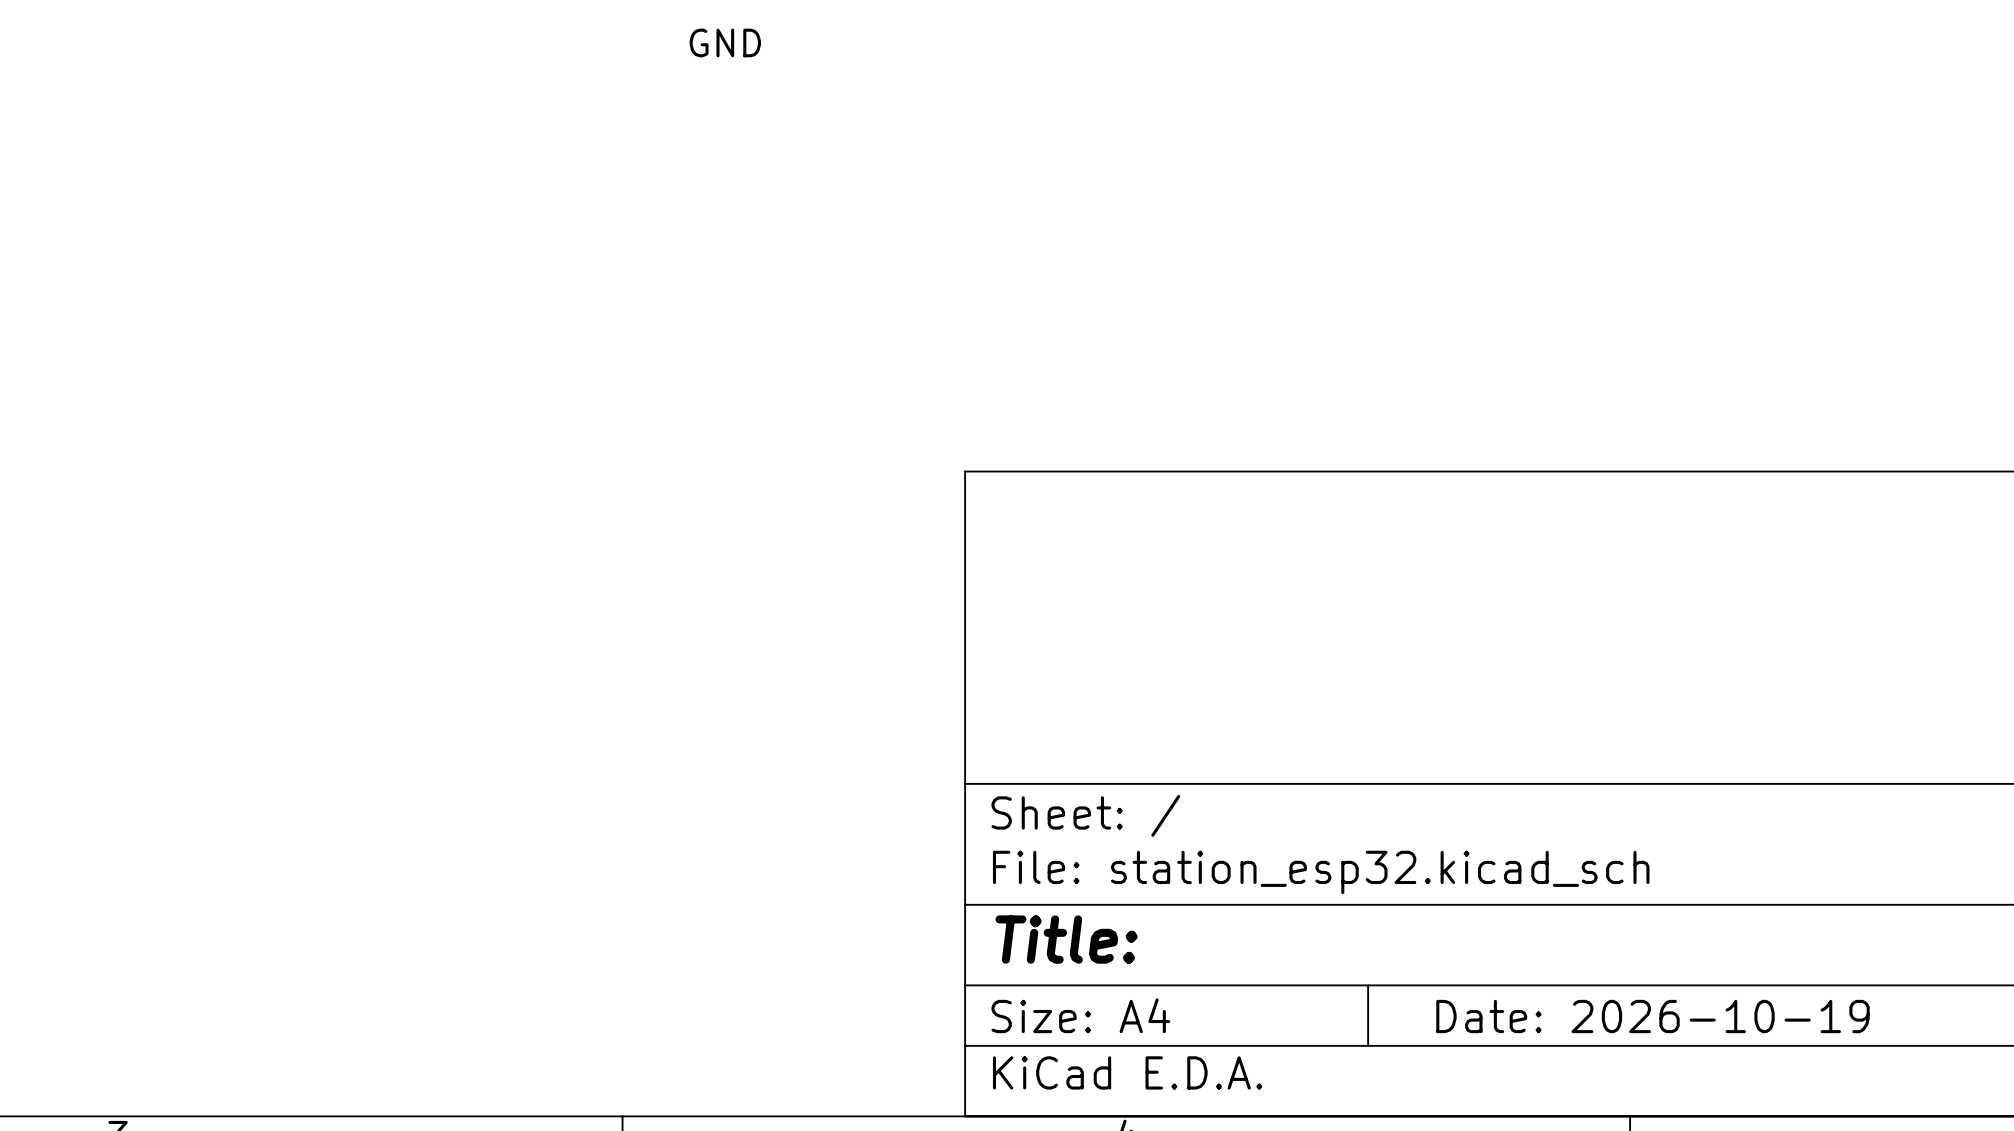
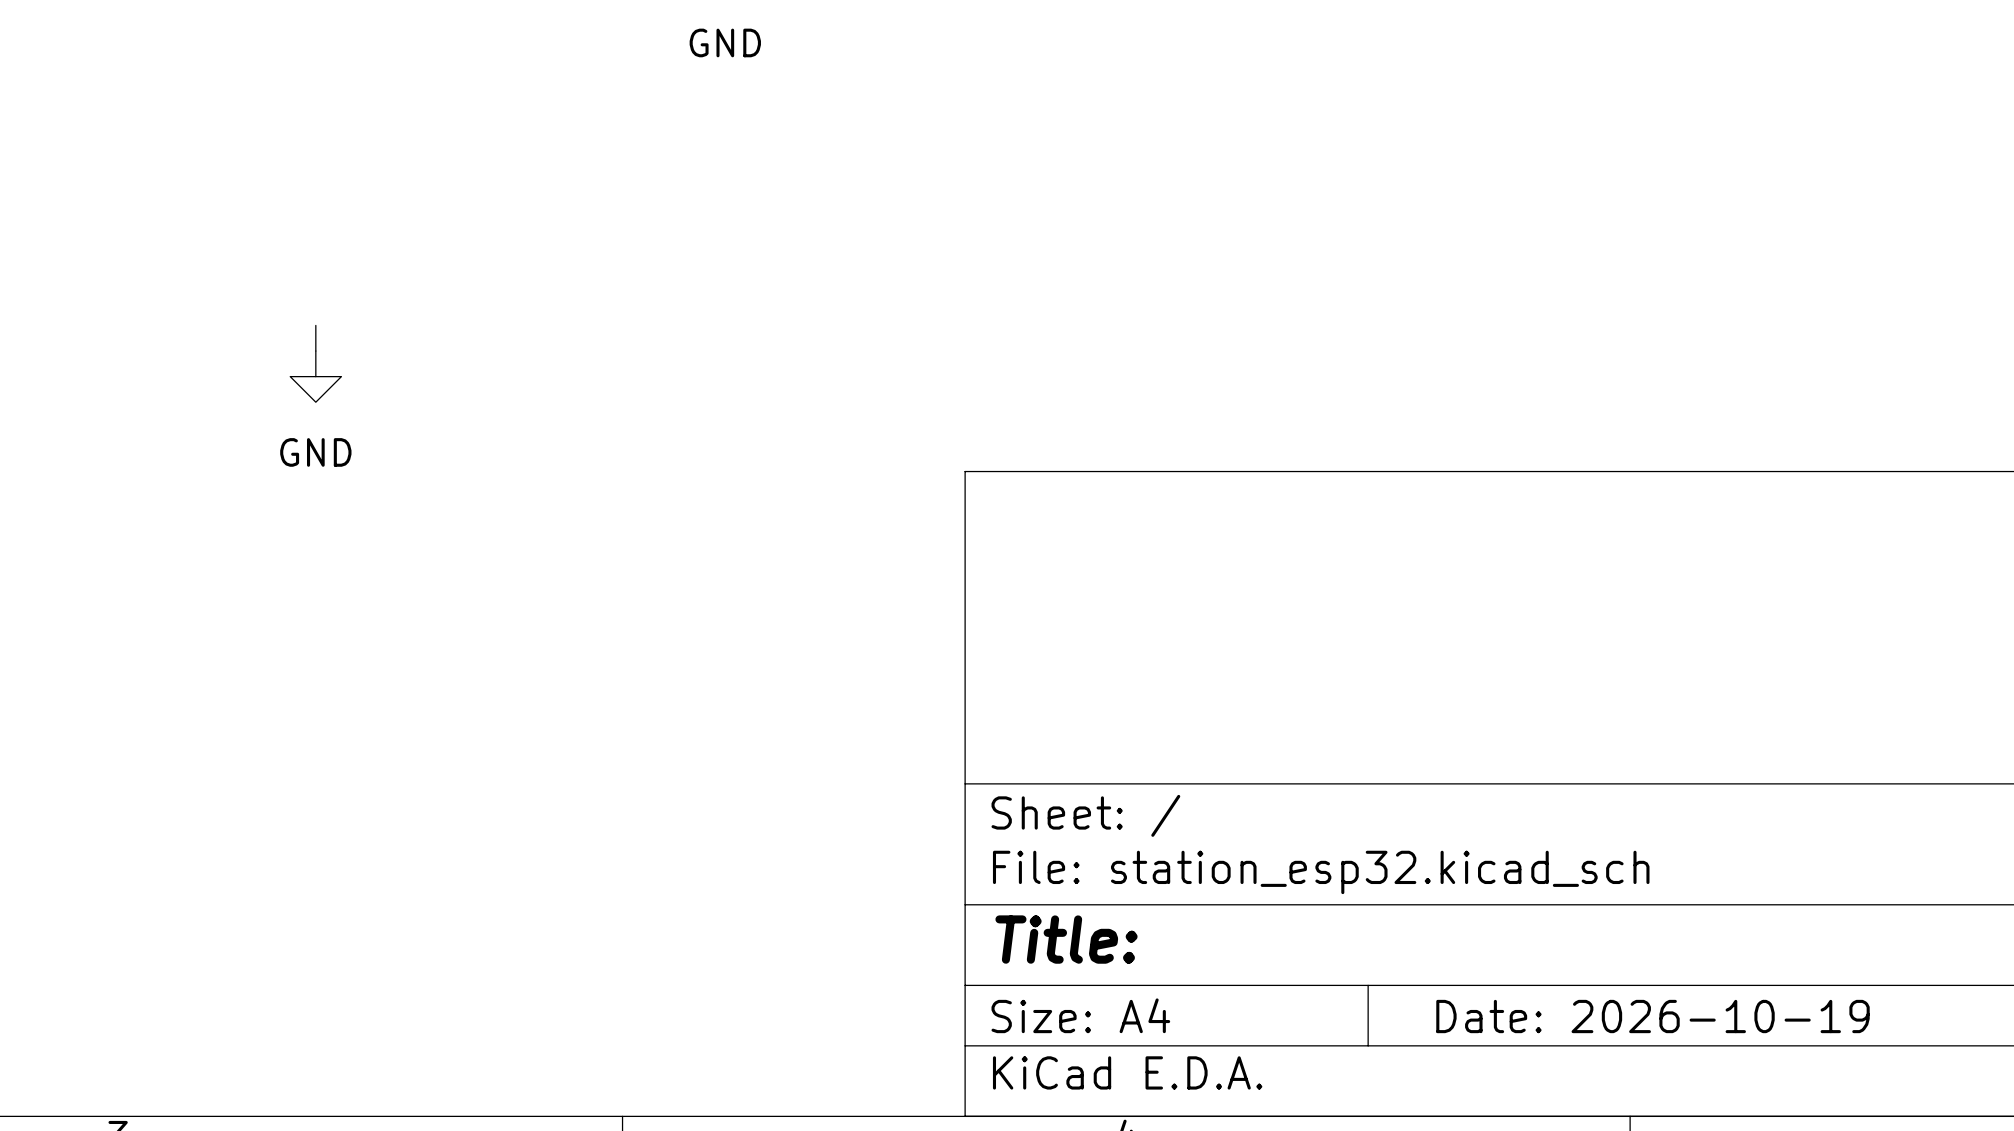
wire: none -> (315, 325) (315, 351)
power symbol: none -> GND (315, 376)

